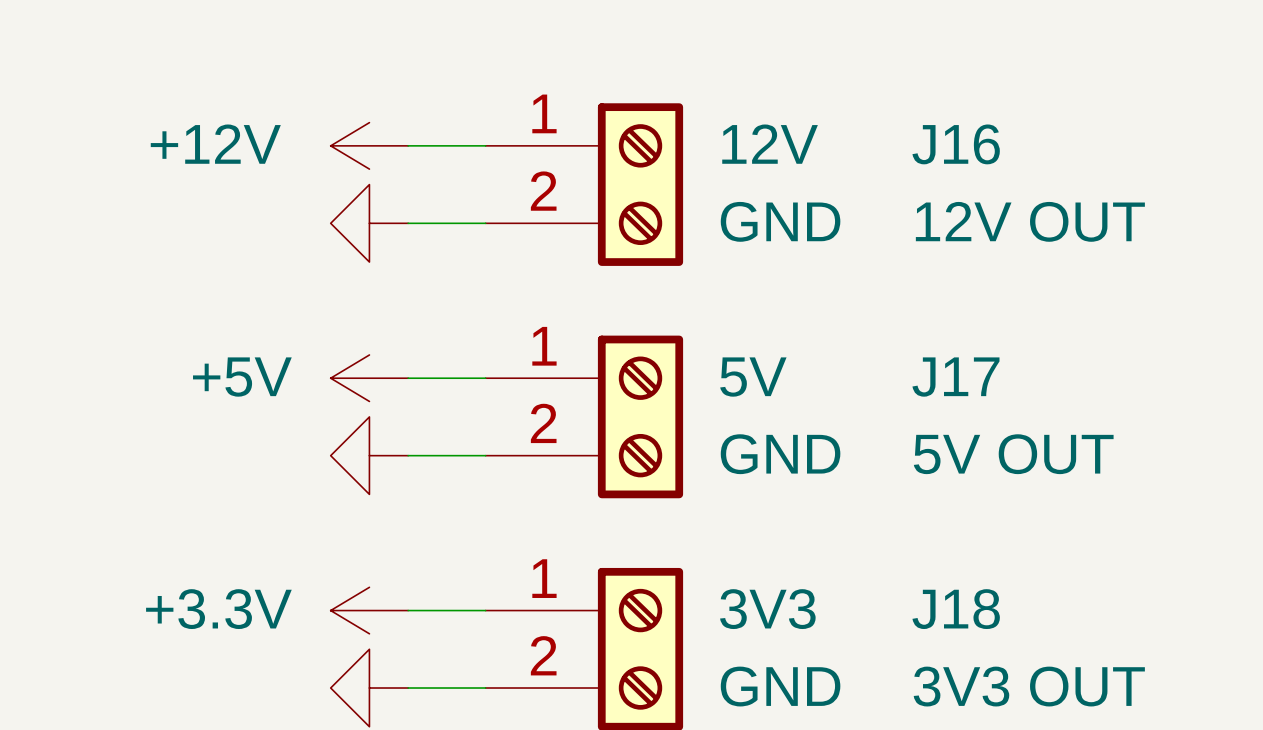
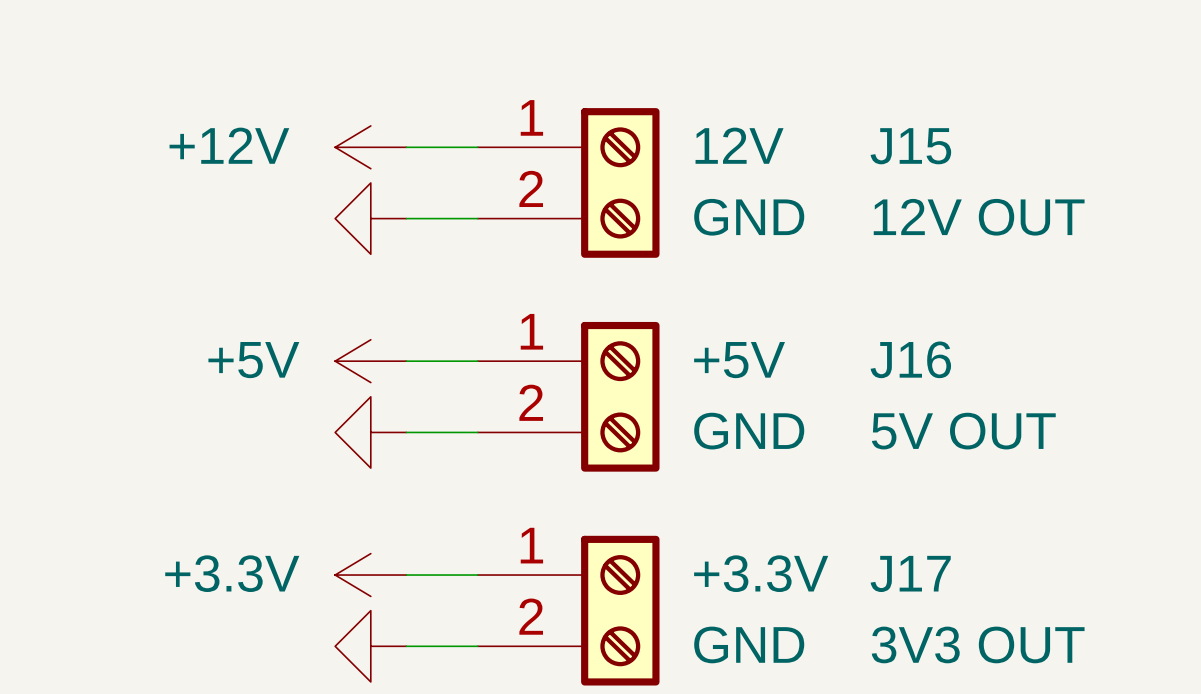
J16 name: J16 (956, 144) -> J15 (910, 146)
J17 text: 5V (753, 377) -> +5V (739, 360)
J17 name: J17 (955, 377) -> J16 (910, 359)
J18 text: 3V3 (767, 609) -> +3.3V (761, 573)
J18 name: J18 (956, 609) -> J17 (910, 573)

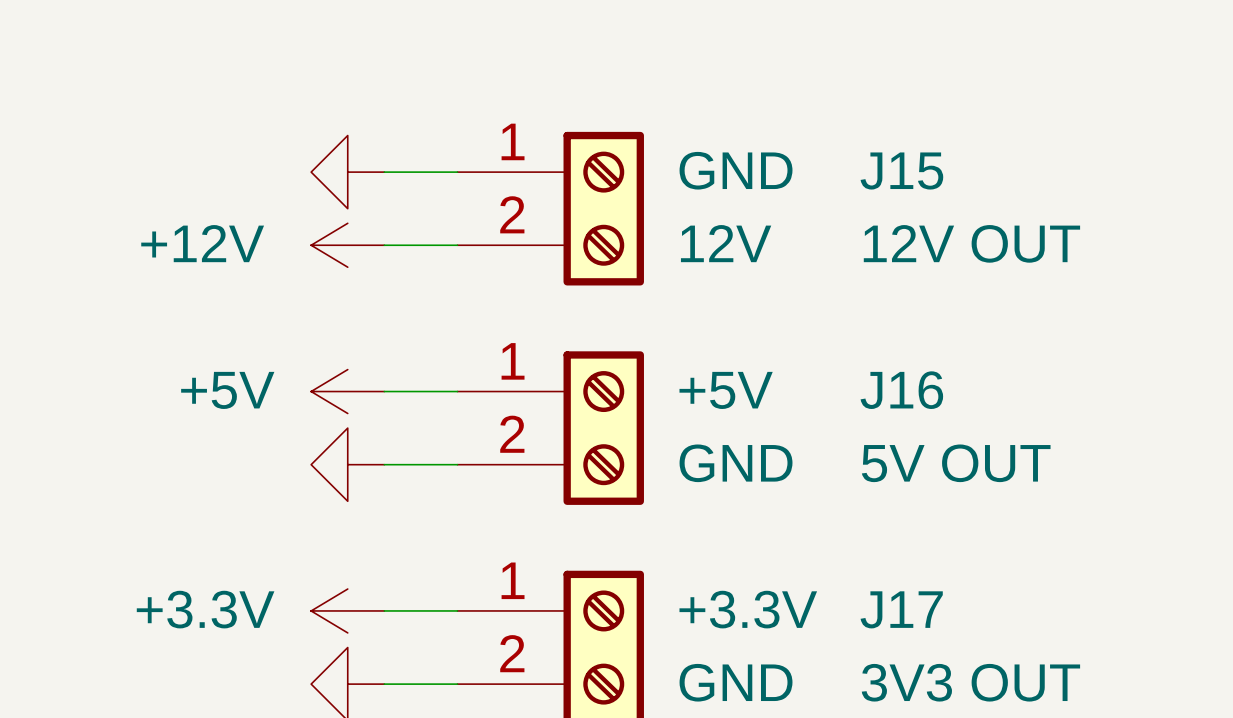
power symbol shape: [335, 125, 407, 169] -> [311, 135, 385, 209]
power symbol text: +12V (229, 145) -> none
J15 text: 12V (739, 145) -> GND (736, 170)
power symbol shape: [335, 182, 407, 255] -> [311, 223, 385, 268]
power symbol text: none -> +12V (202, 243)
J15 text: GND (749, 217) -> 12V (726, 243)

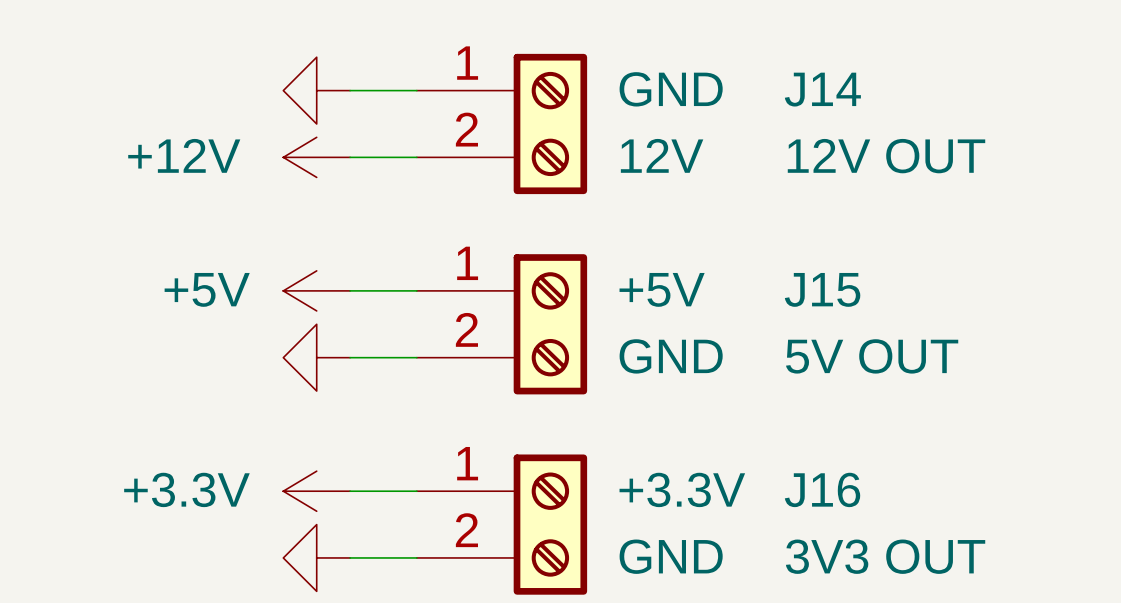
J15 name: J15 (901, 171) -> J14 (822, 89)
J16 name: J16 (901, 390) -> J15 (822, 289)
J17 name: J17 (901, 609) -> J16 (822, 489)

